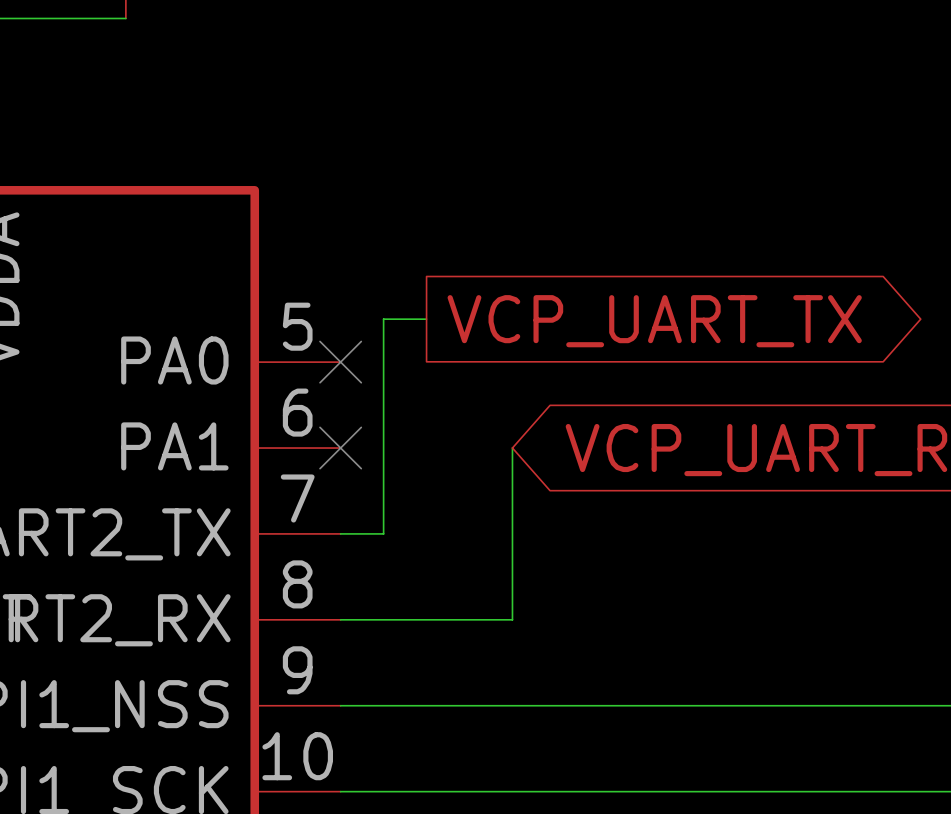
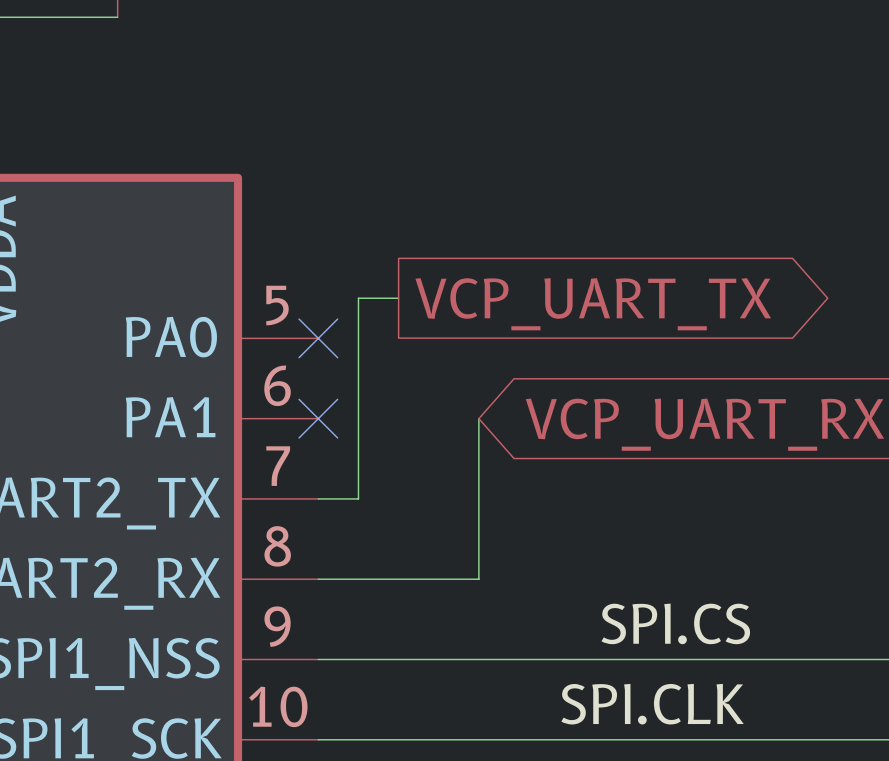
label: none -> SPI.CS (675, 623)
label: none -> SPI.CLK (652, 704)

